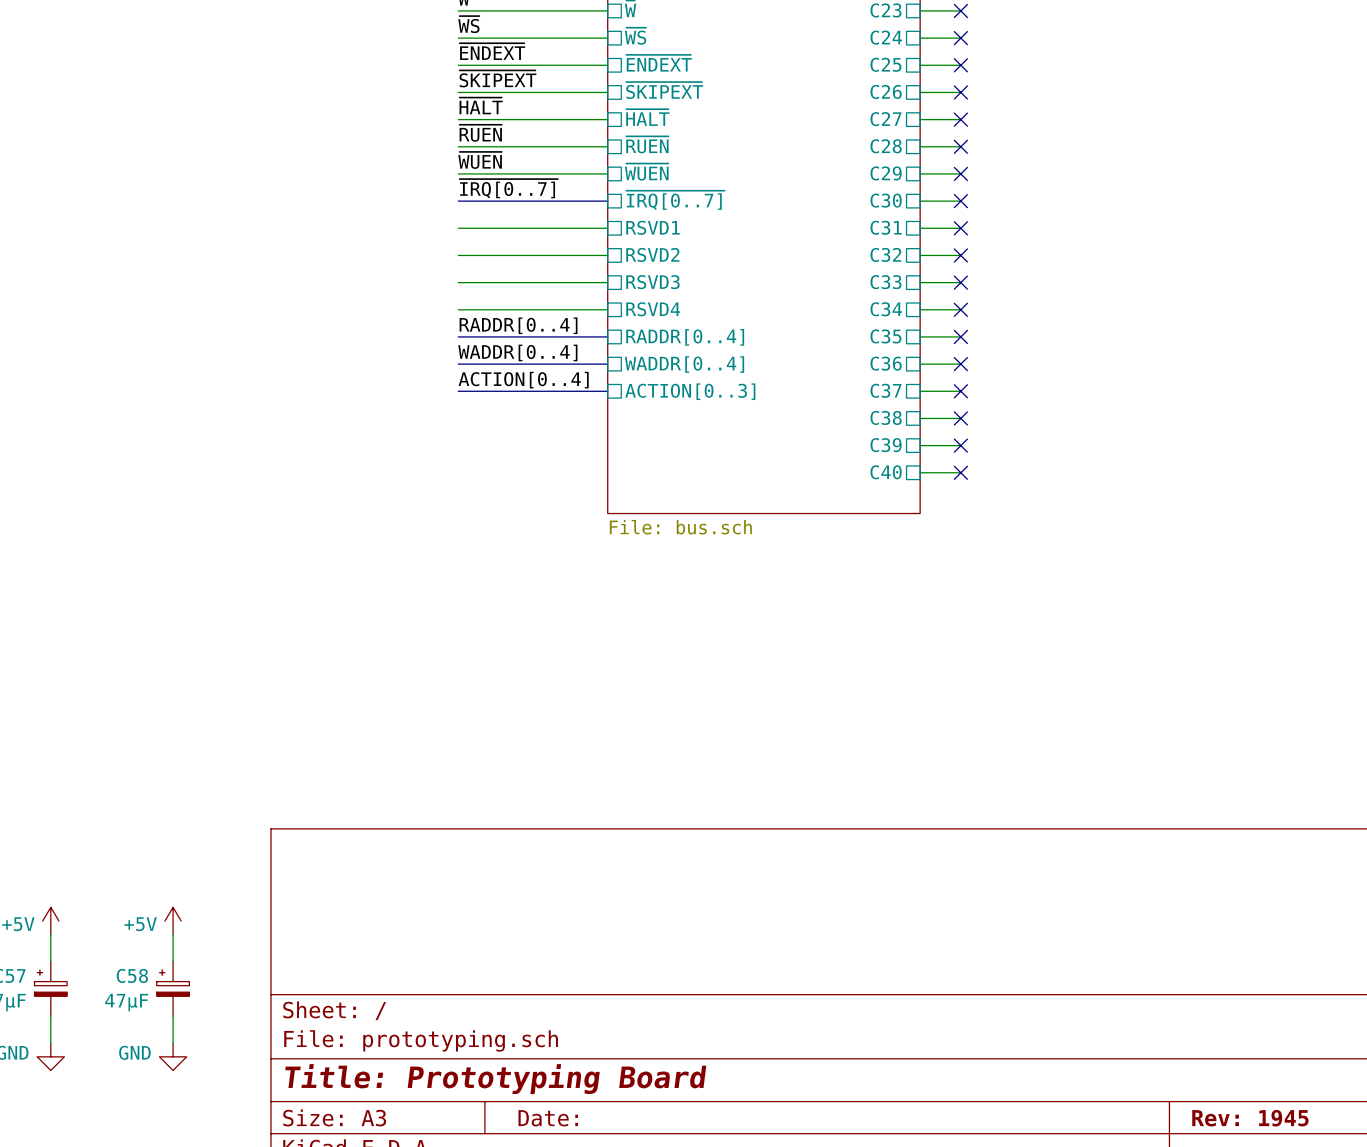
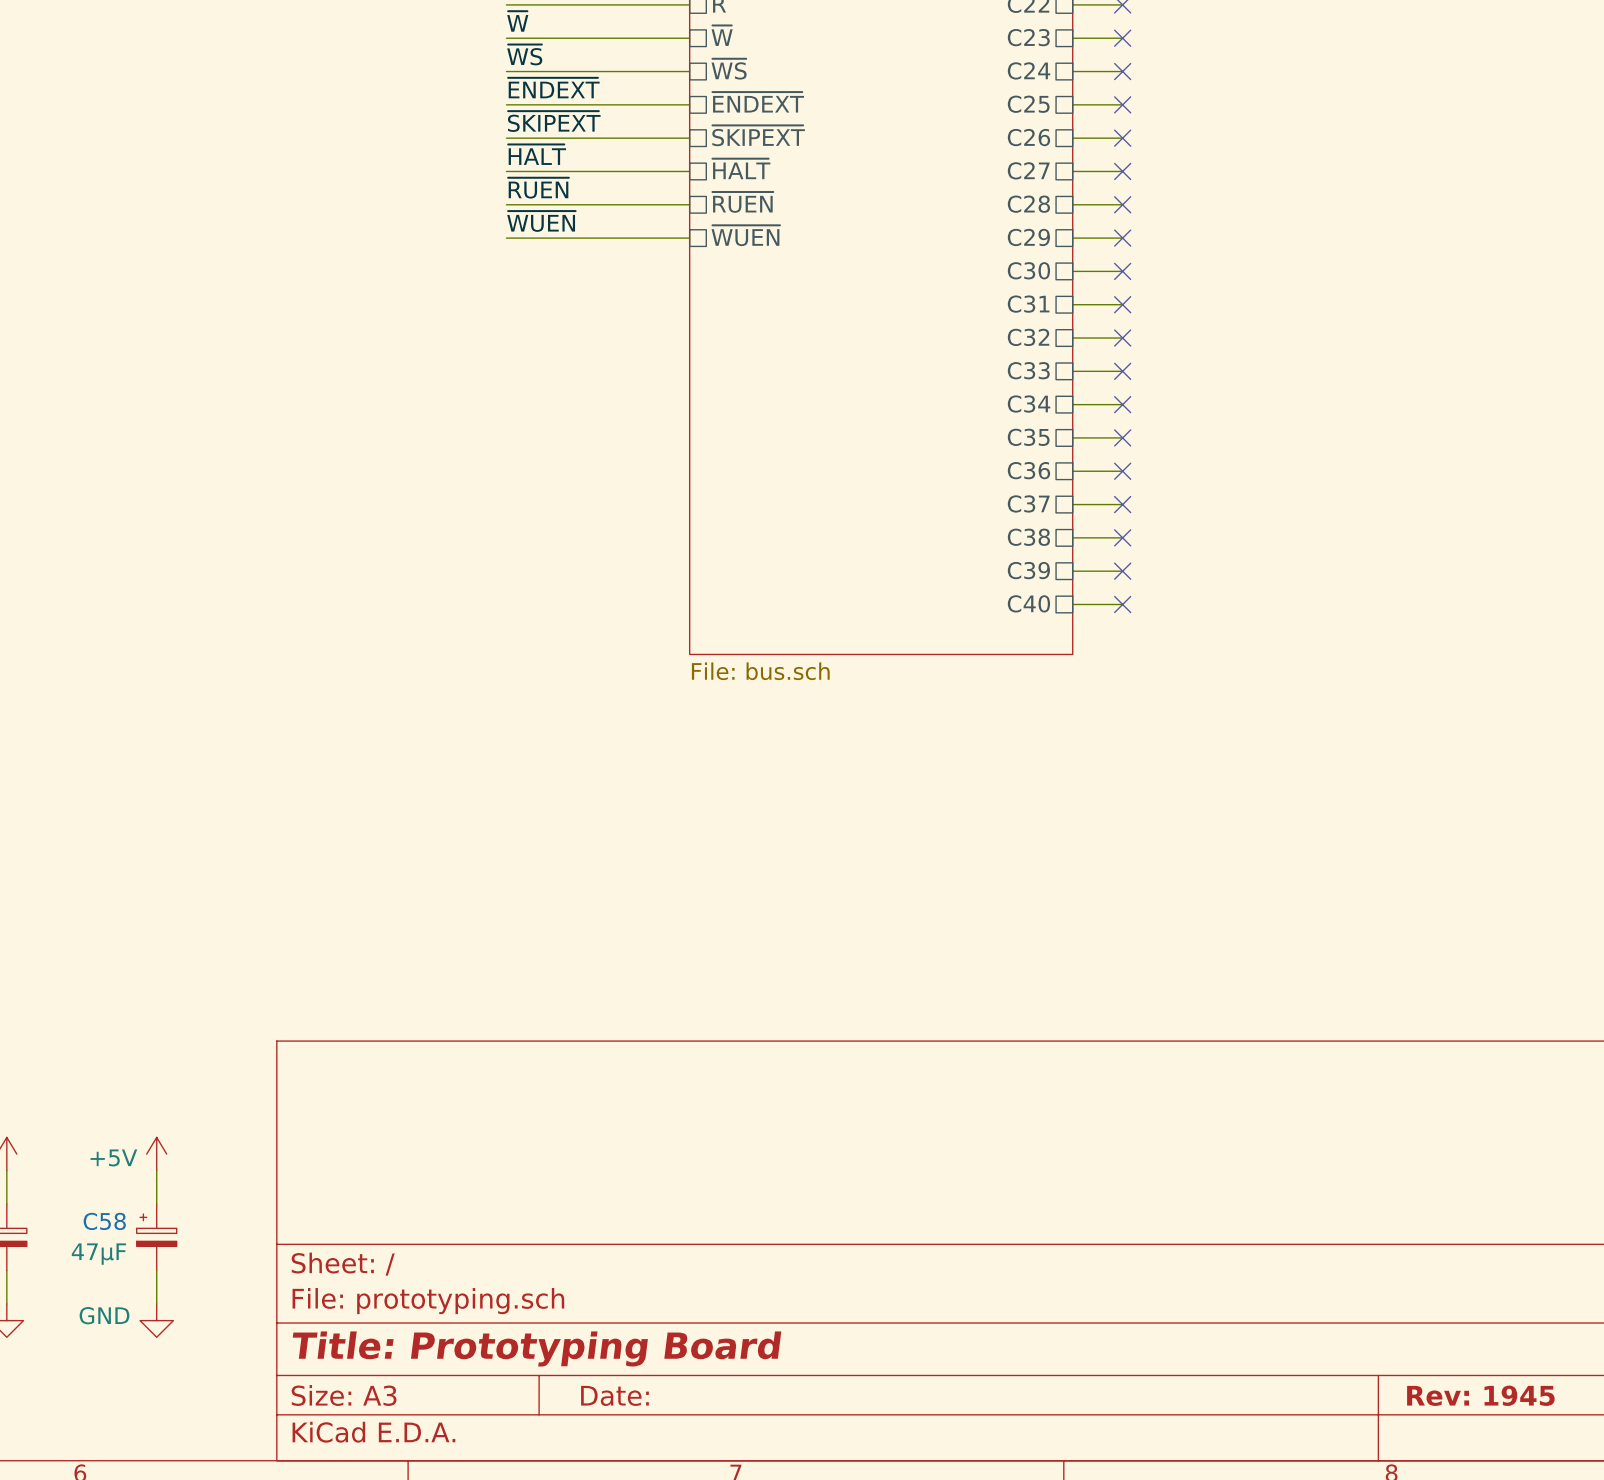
label: ~{IRQ[0..7]} (508, 188) -> none
sheet pin: ~{IRQ[0..7]} (675, 200) -> none
bus: (458, 201) (607, 201) -> none
sheet pin: RSVD1 (653, 227) -> none
wire: (458, 228) (607, 228) -> none
sheet pin: RSVD2 (652, 254) -> none
wire: (458, 255) (607, 255) -> none
wire: (458, 282) (607, 282) -> none
sheet pin: RSVD3 (652, 282) -> none
wire: (458, 309) (607, 309) -> none
sheet pin: RSVD4 (653, 309) -> none
label: RADDR[0..4] (518, 325) -> none
bus: (458, 336) (607, 336) -> none
sheet pin: RADDR[0..4] (685, 337) -> none
label: WADDR[0..4] (517, 352) -> none
bus: (458, 364) (607, 364) -> none
sheet pin: WADDR[0..4] (684, 364) -> none
label: ACTION[0..4] (523, 380) -> none
bus: (458, 391) (607, 391) -> none
sheet pin: ACTION[0..3] (690, 391) -> none

